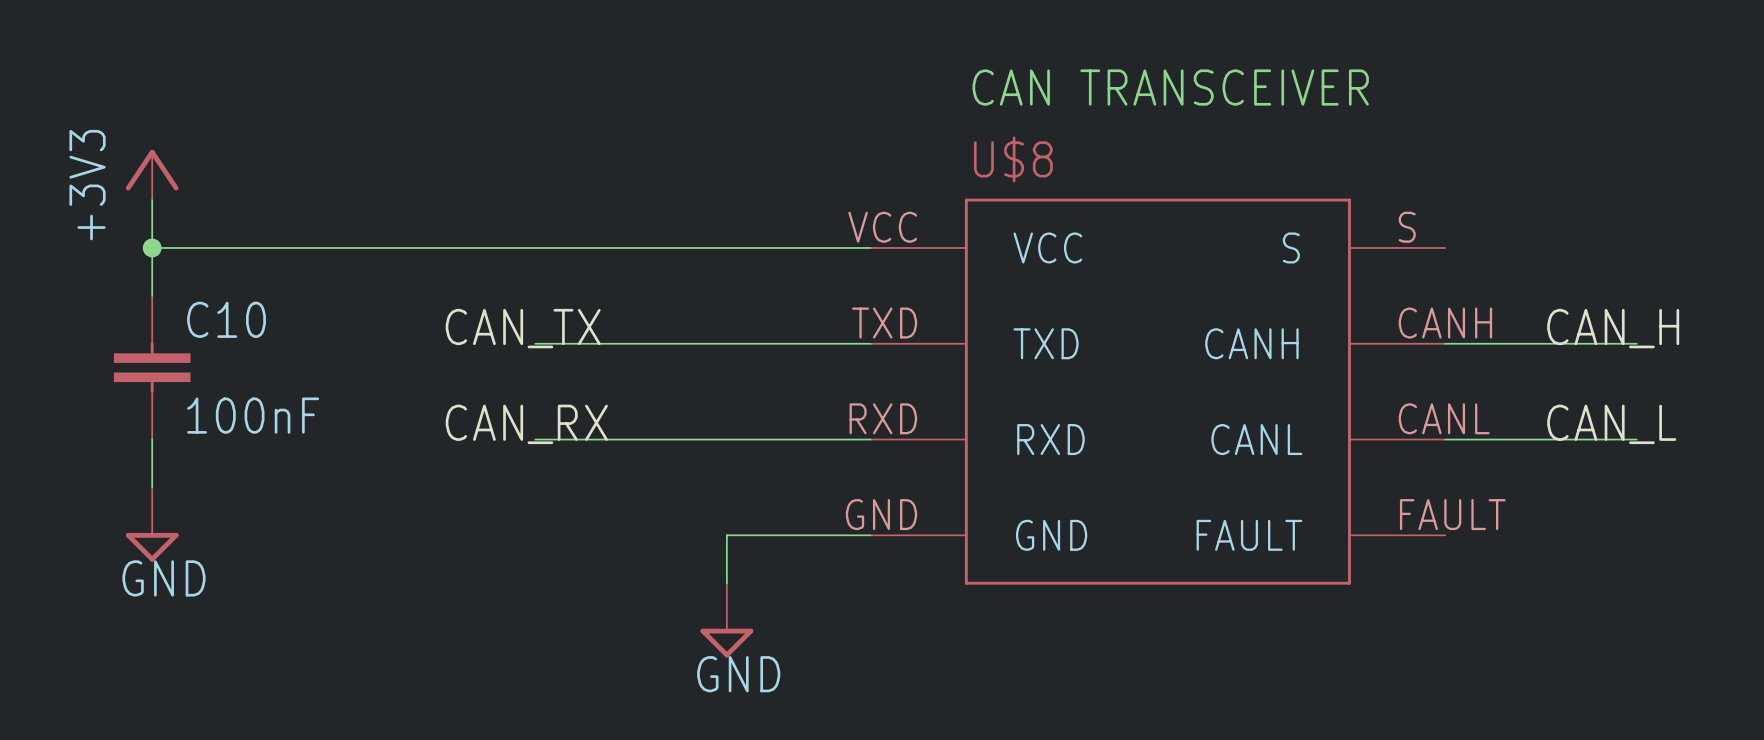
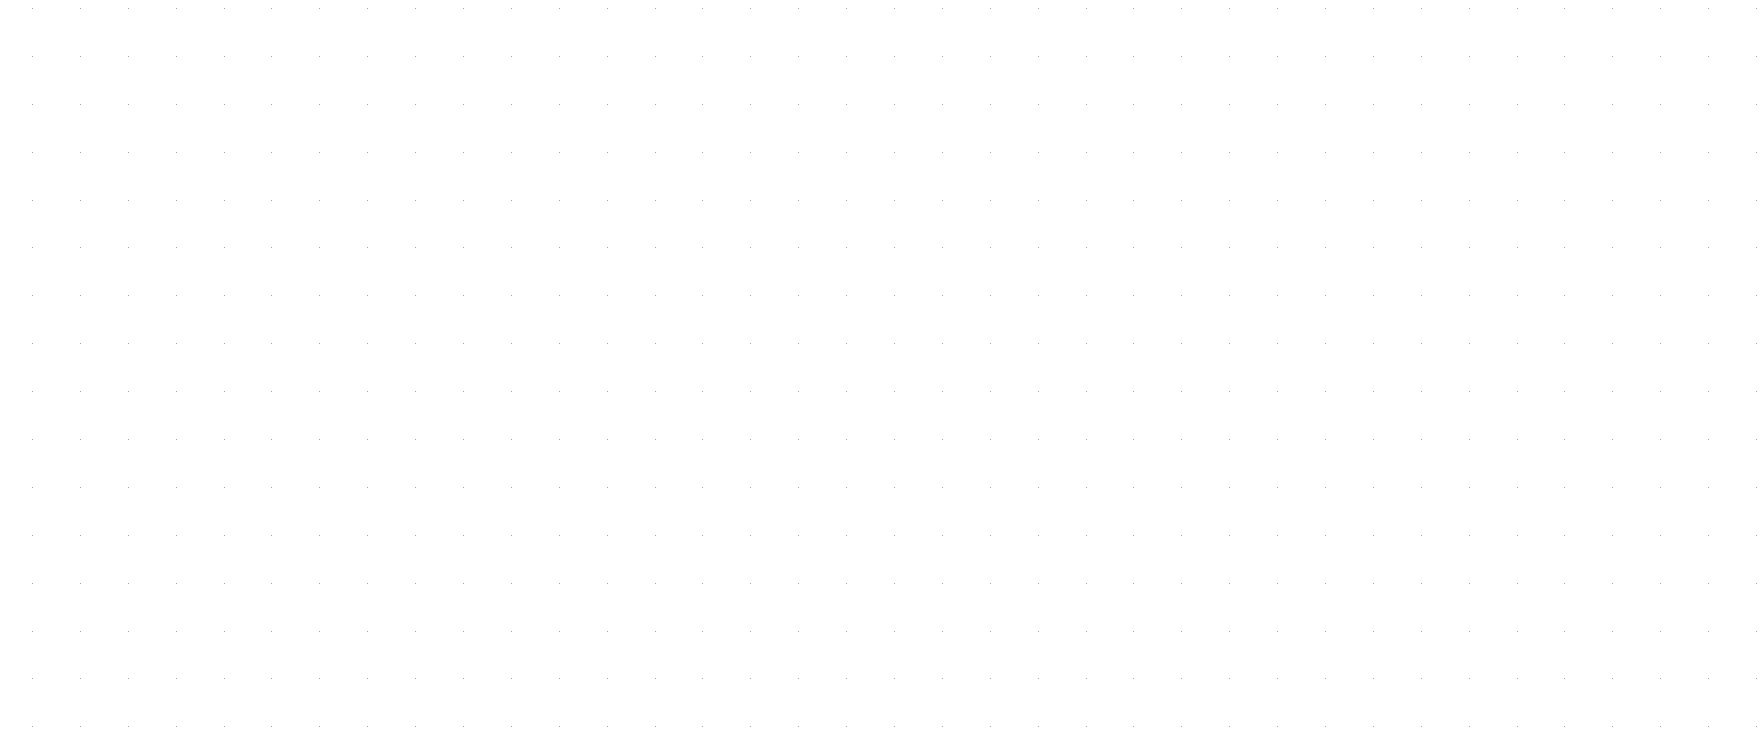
text: CAN TRANSCEIVER (1170, 87) -> none
power symbol: +3V3 (152, 174) -> none
wire: (152, 200) (152, 295) -> none
wire: (152, 247) (870, 247) -> none
junction: (152, 247) -> none
label: CAN_TX (523, 328) -> none
label: CAN_H (1613, 328) -> none
wire: (535, 343) (870, 343) -> none
wire: (1445, 343) (1636, 343) -> none
C10: 100nF (152, 367) -> none
U$8: (1157, 391) -> none
label: CAN_RX (526, 424) -> none
label: CAN_L (1611, 424) -> none
wire: (152, 439) (152, 487) -> none
wire: (535, 439) (870, 439) -> none
wire: (1445, 439) (1636, 439) -> none
power symbol: GND (152, 524) -> none
wire: (870, 535) (726, 535) (726, 583) -> none
power symbol: GND (726, 620) -> none

